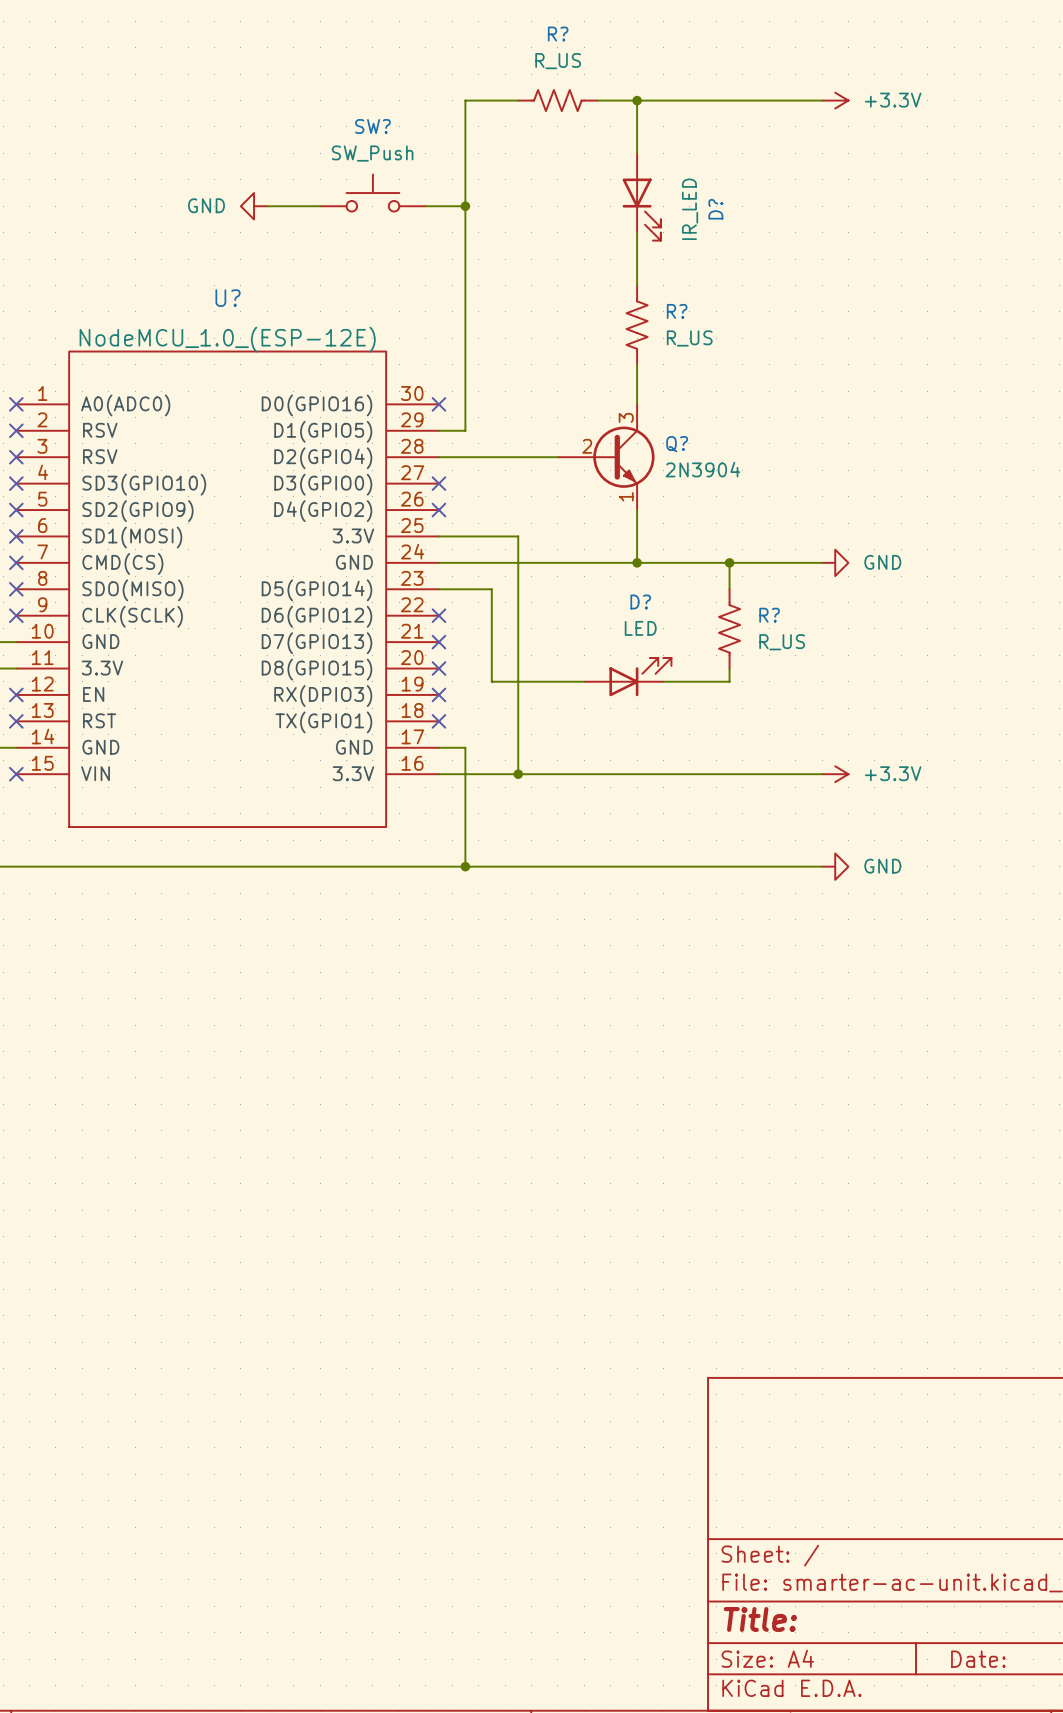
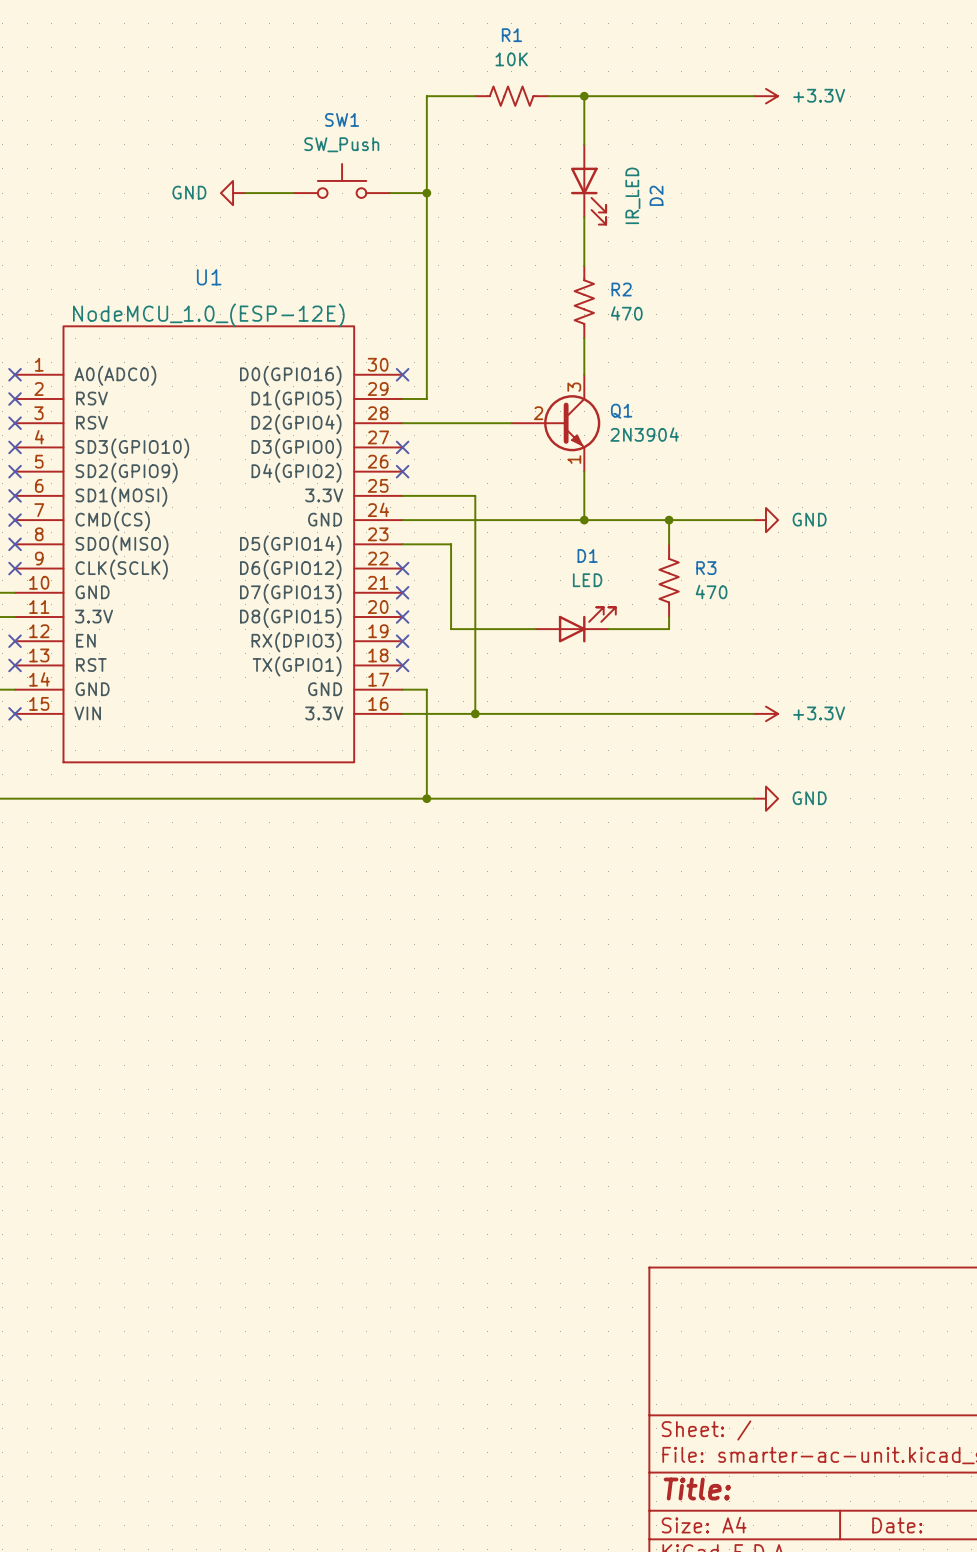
R? name: R? (558, 34) -> R1 (511, 35)
R? value: R_US (558, 61) -> 10K (511, 59)
SW? name: SW? (372, 126) -> SW1 (342, 119)
D? name: D? (715, 209) -> D2 (656, 195)
U? name: U? (228, 298) -> U1 (209, 277)
R? name: R? (677, 311) -> R2 (621, 289)
R? value: R_US (689, 338) -> 470 (626, 313)
Q? name: Q? (677, 444) -> Q1 (621, 411)
D? name: D? (640, 601) -> D1 (587, 555)
R? name: R? (769, 615) -> R3 (706, 568)
R? value: R_US (782, 642) -> 470 (711, 592)

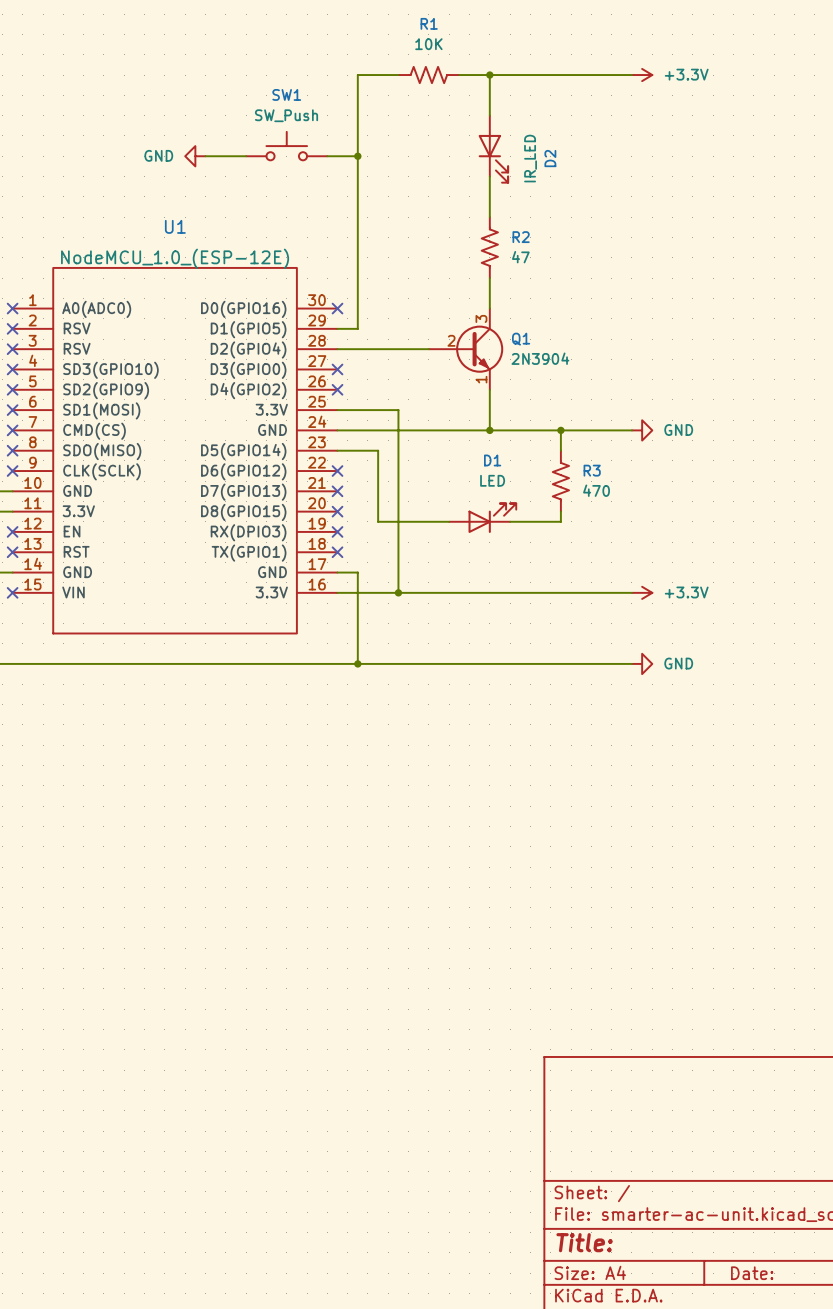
R2 value: 470 (626, 313) -> 47 (520, 257)

